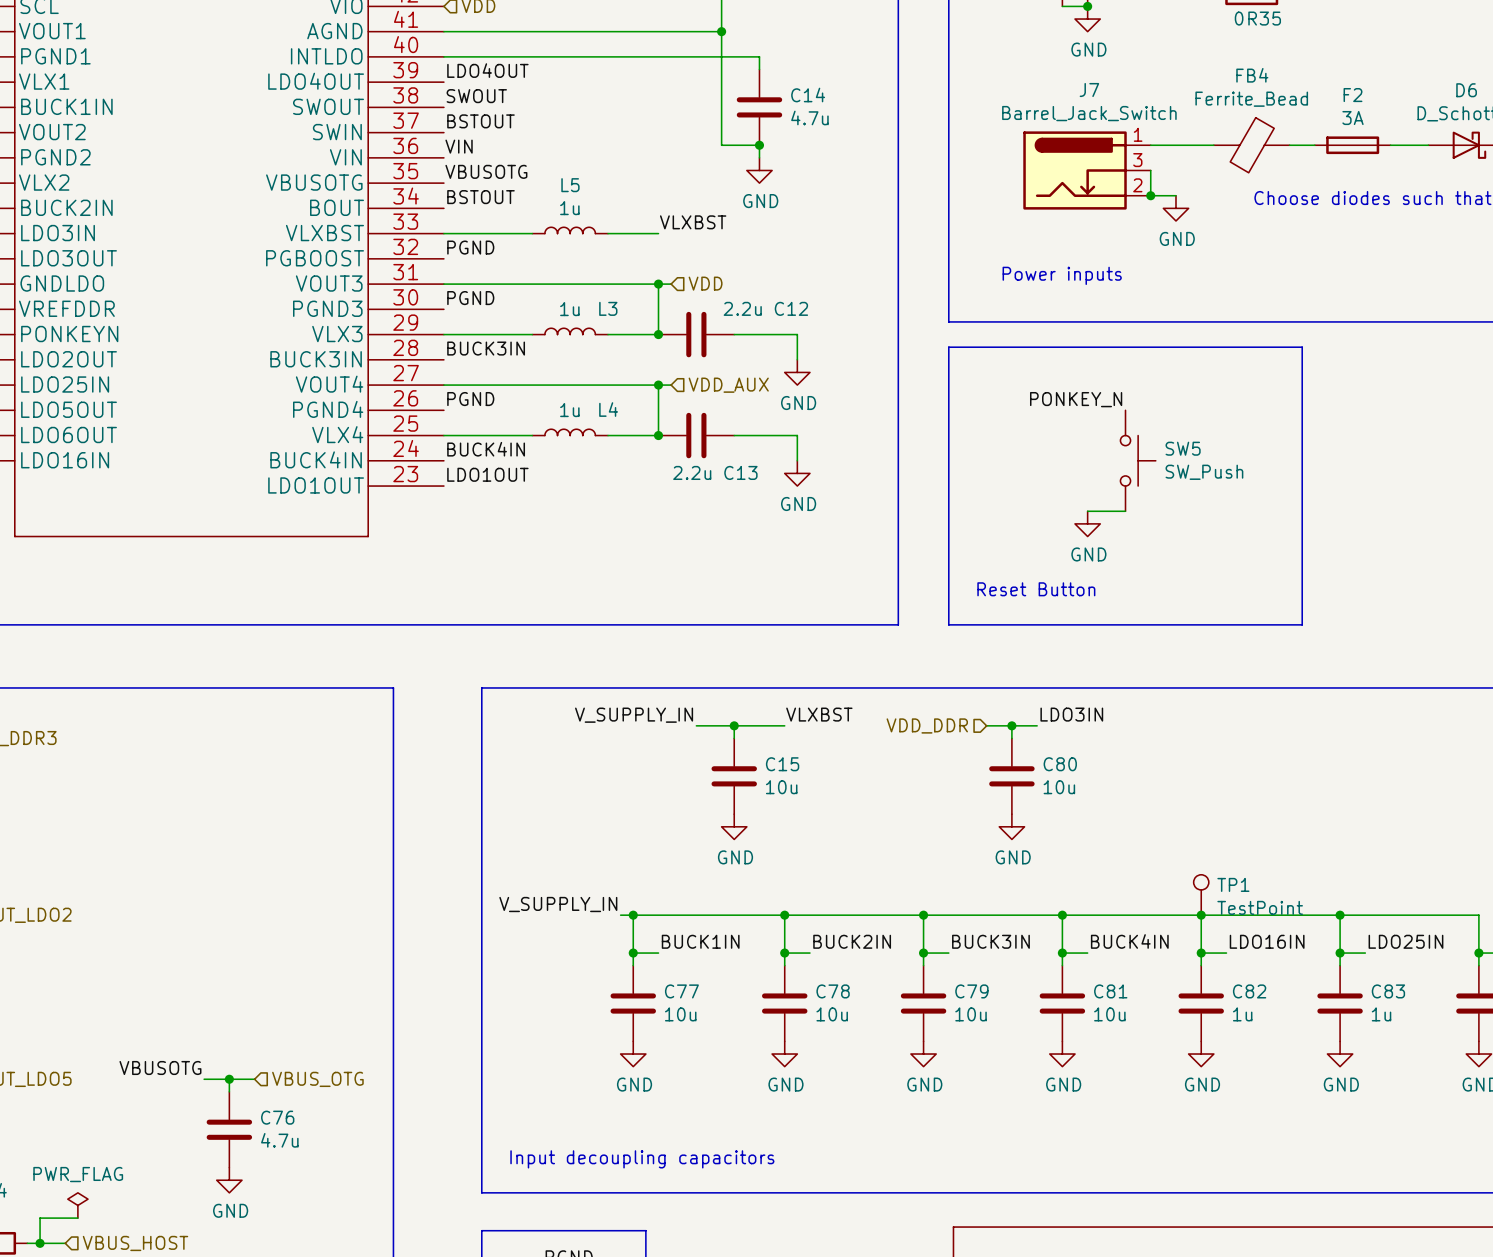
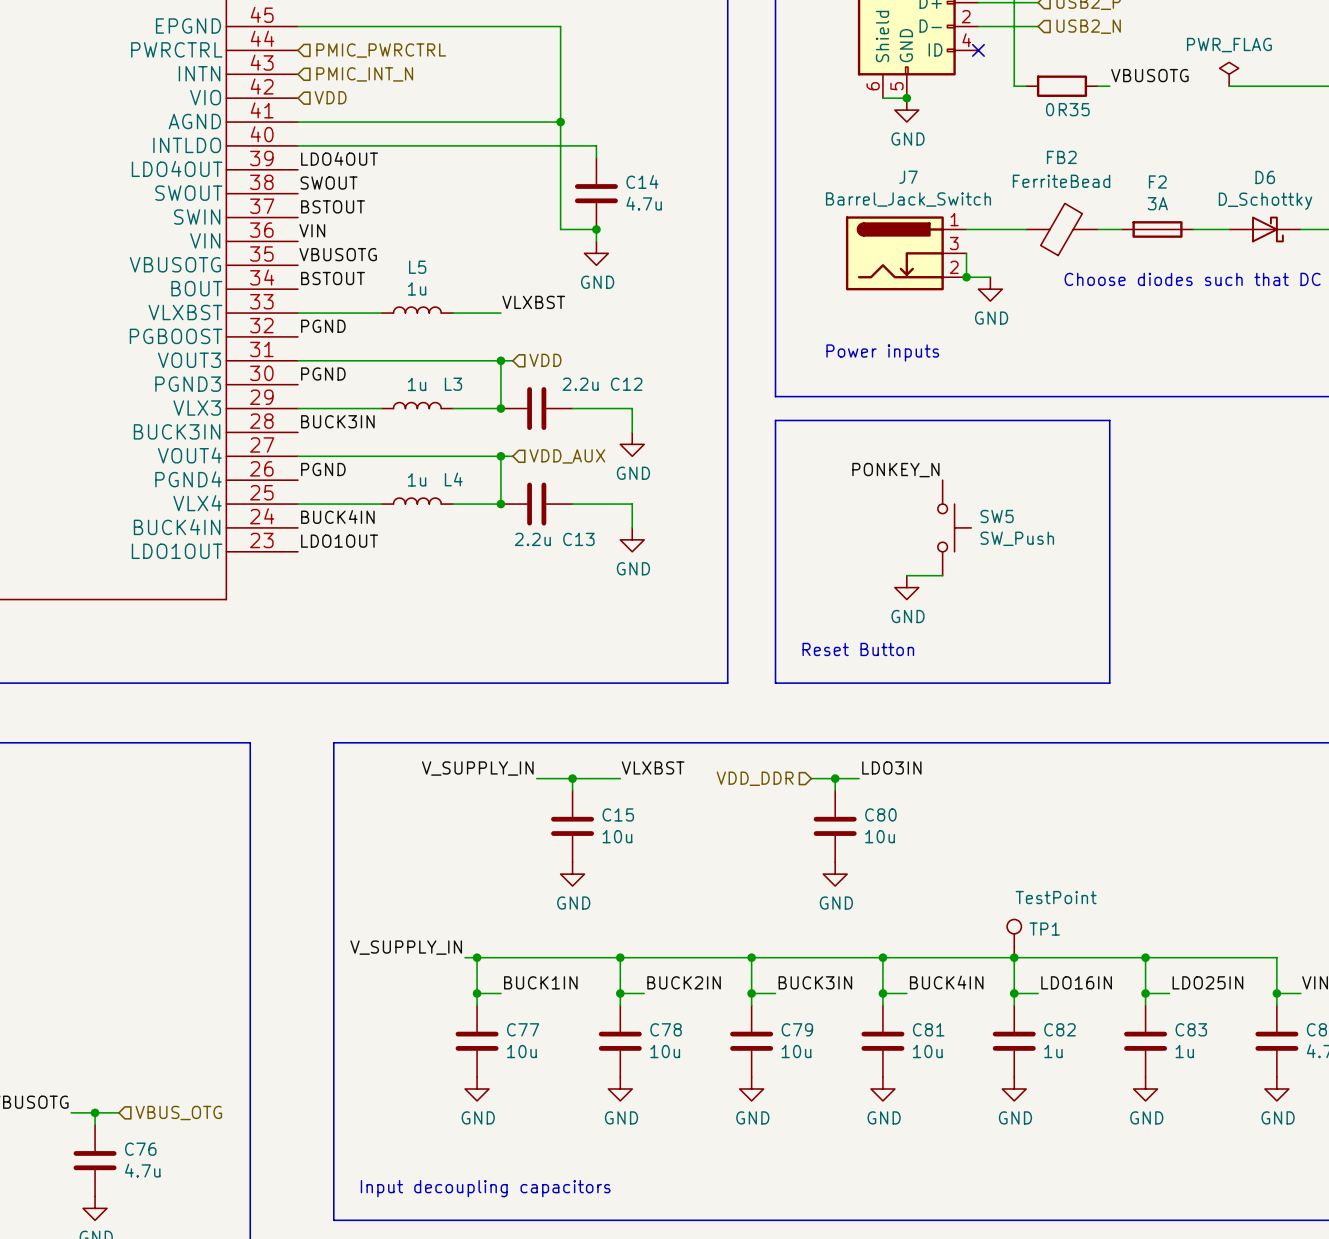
FB4: Ferrite_Bead (1251, 145) -> none
FB2: none -> FerriteBead (1062, 229)
TP1 value position: TestPoint (1260, 907) -> TestPoint (1056, 897)

